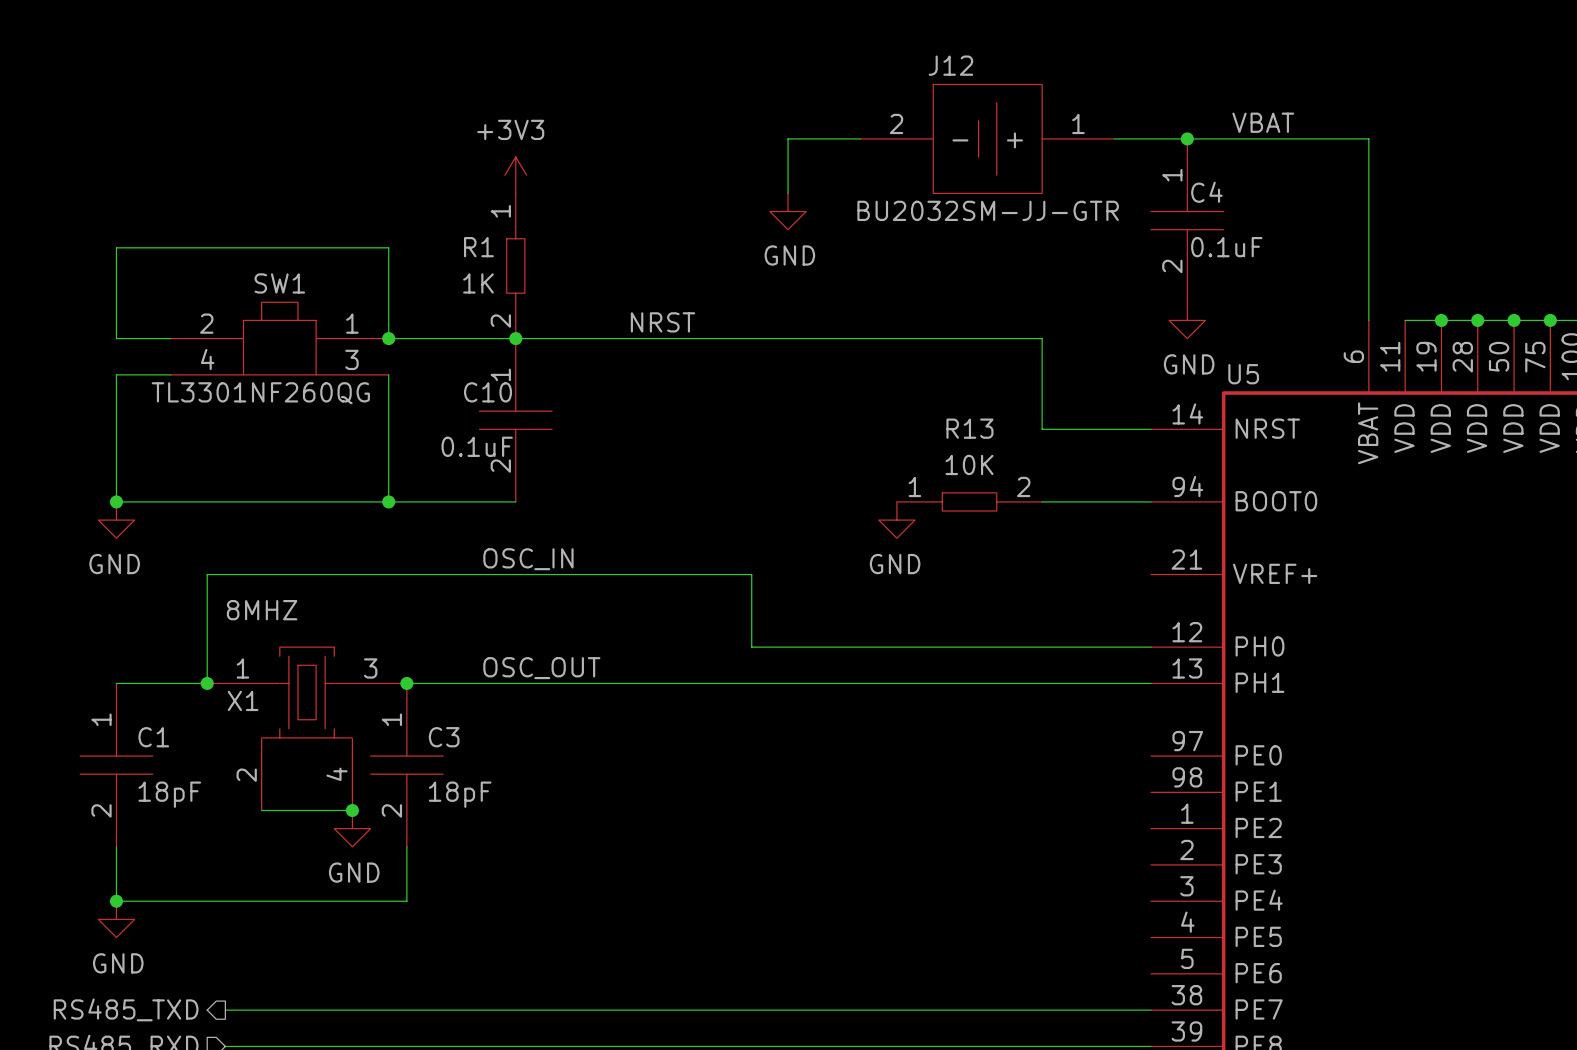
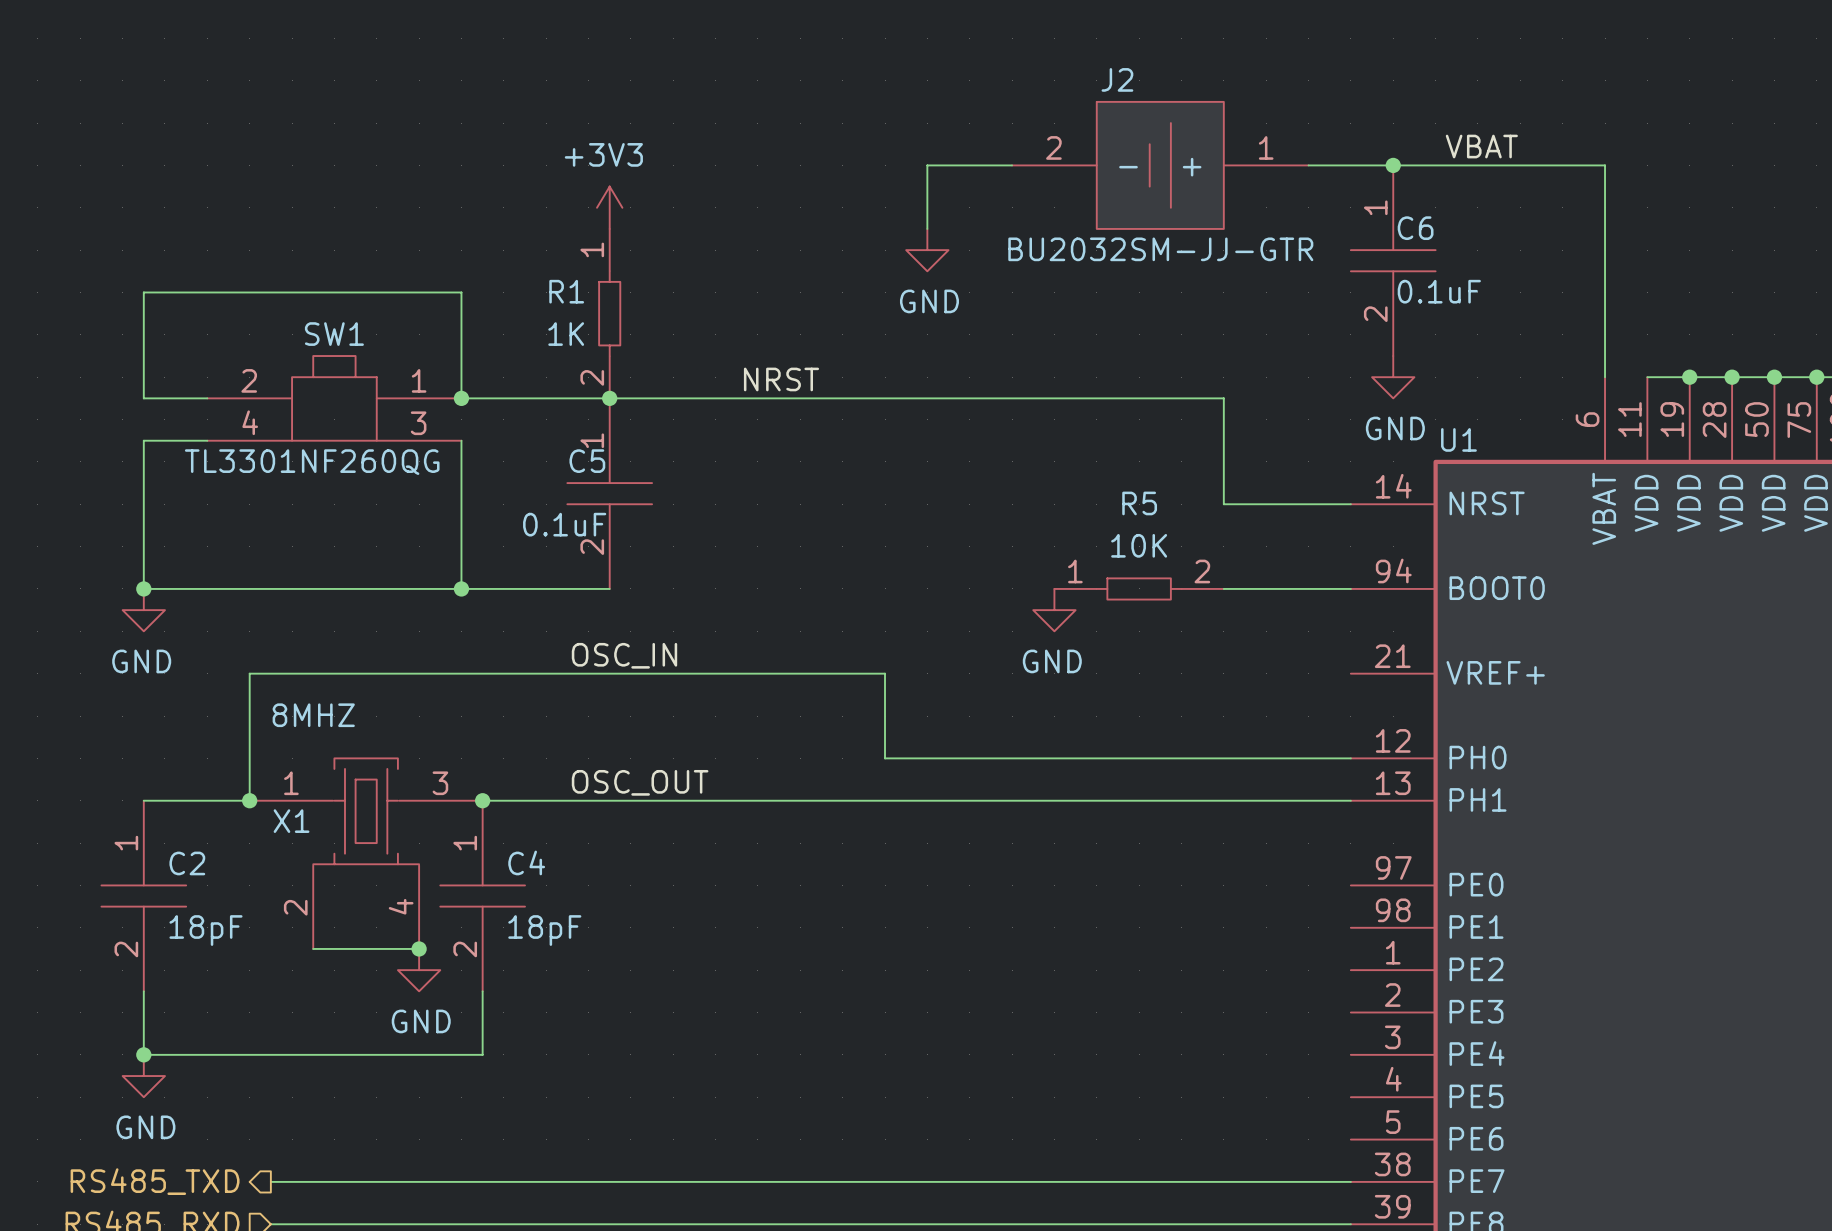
J12 name: J12 (950, 65) -> J2 (1117, 79)
C4 name: C4 (1206, 192) -> C6 (1415, 228)
U5 name: U5 (1243, 374) -> U1 (1458, 439)
C10 name: C10 (487, 392) -> C5 (587, 461)
R13 name: R13 (969, 428) -> R5 (1139, 503)
C1 name: C1 (153, 737) -> C2 (187, 863)
C3 name: C3 (444, 737) -> C4 (526, 862)

